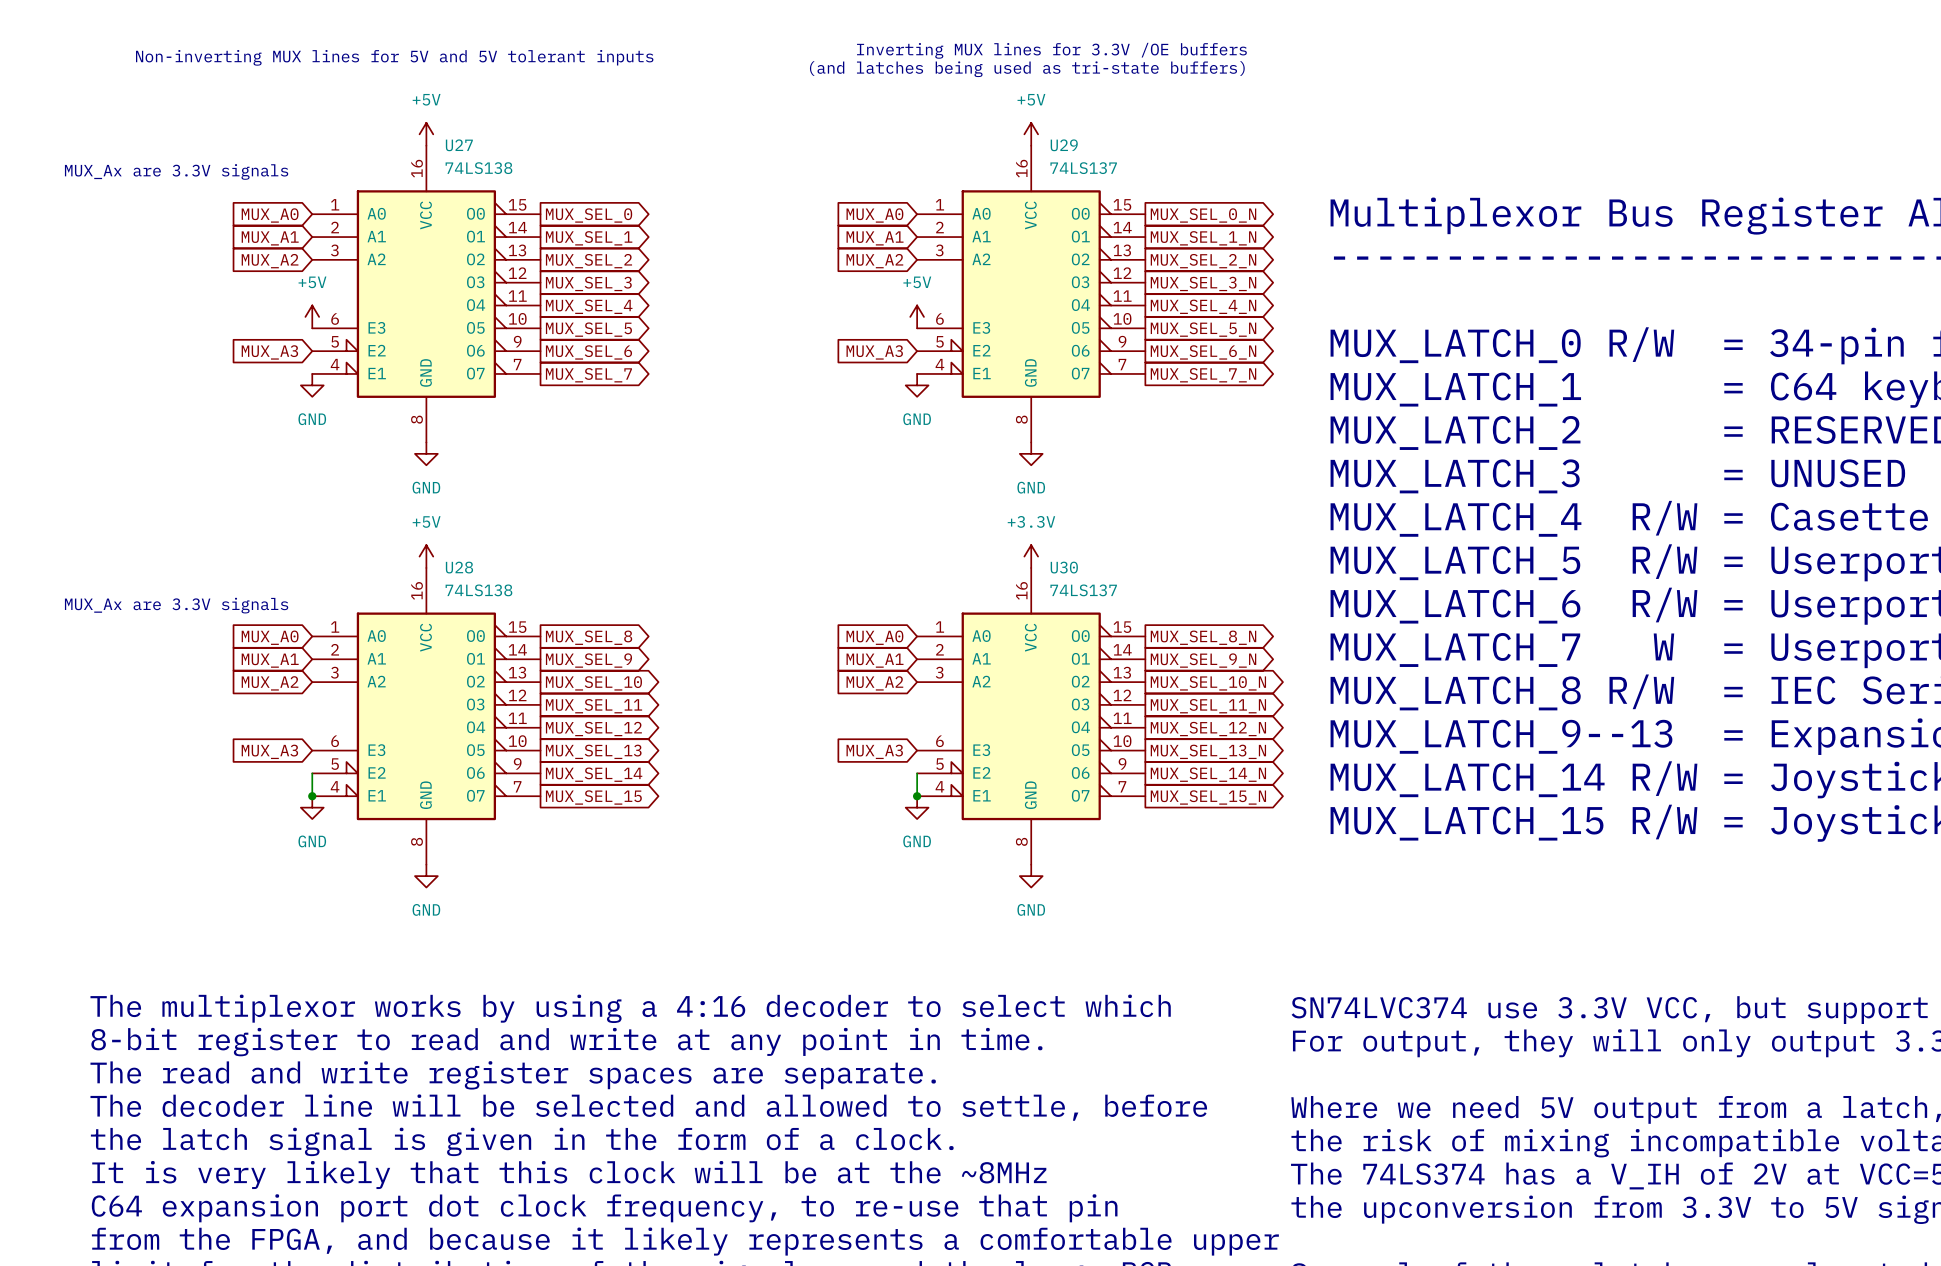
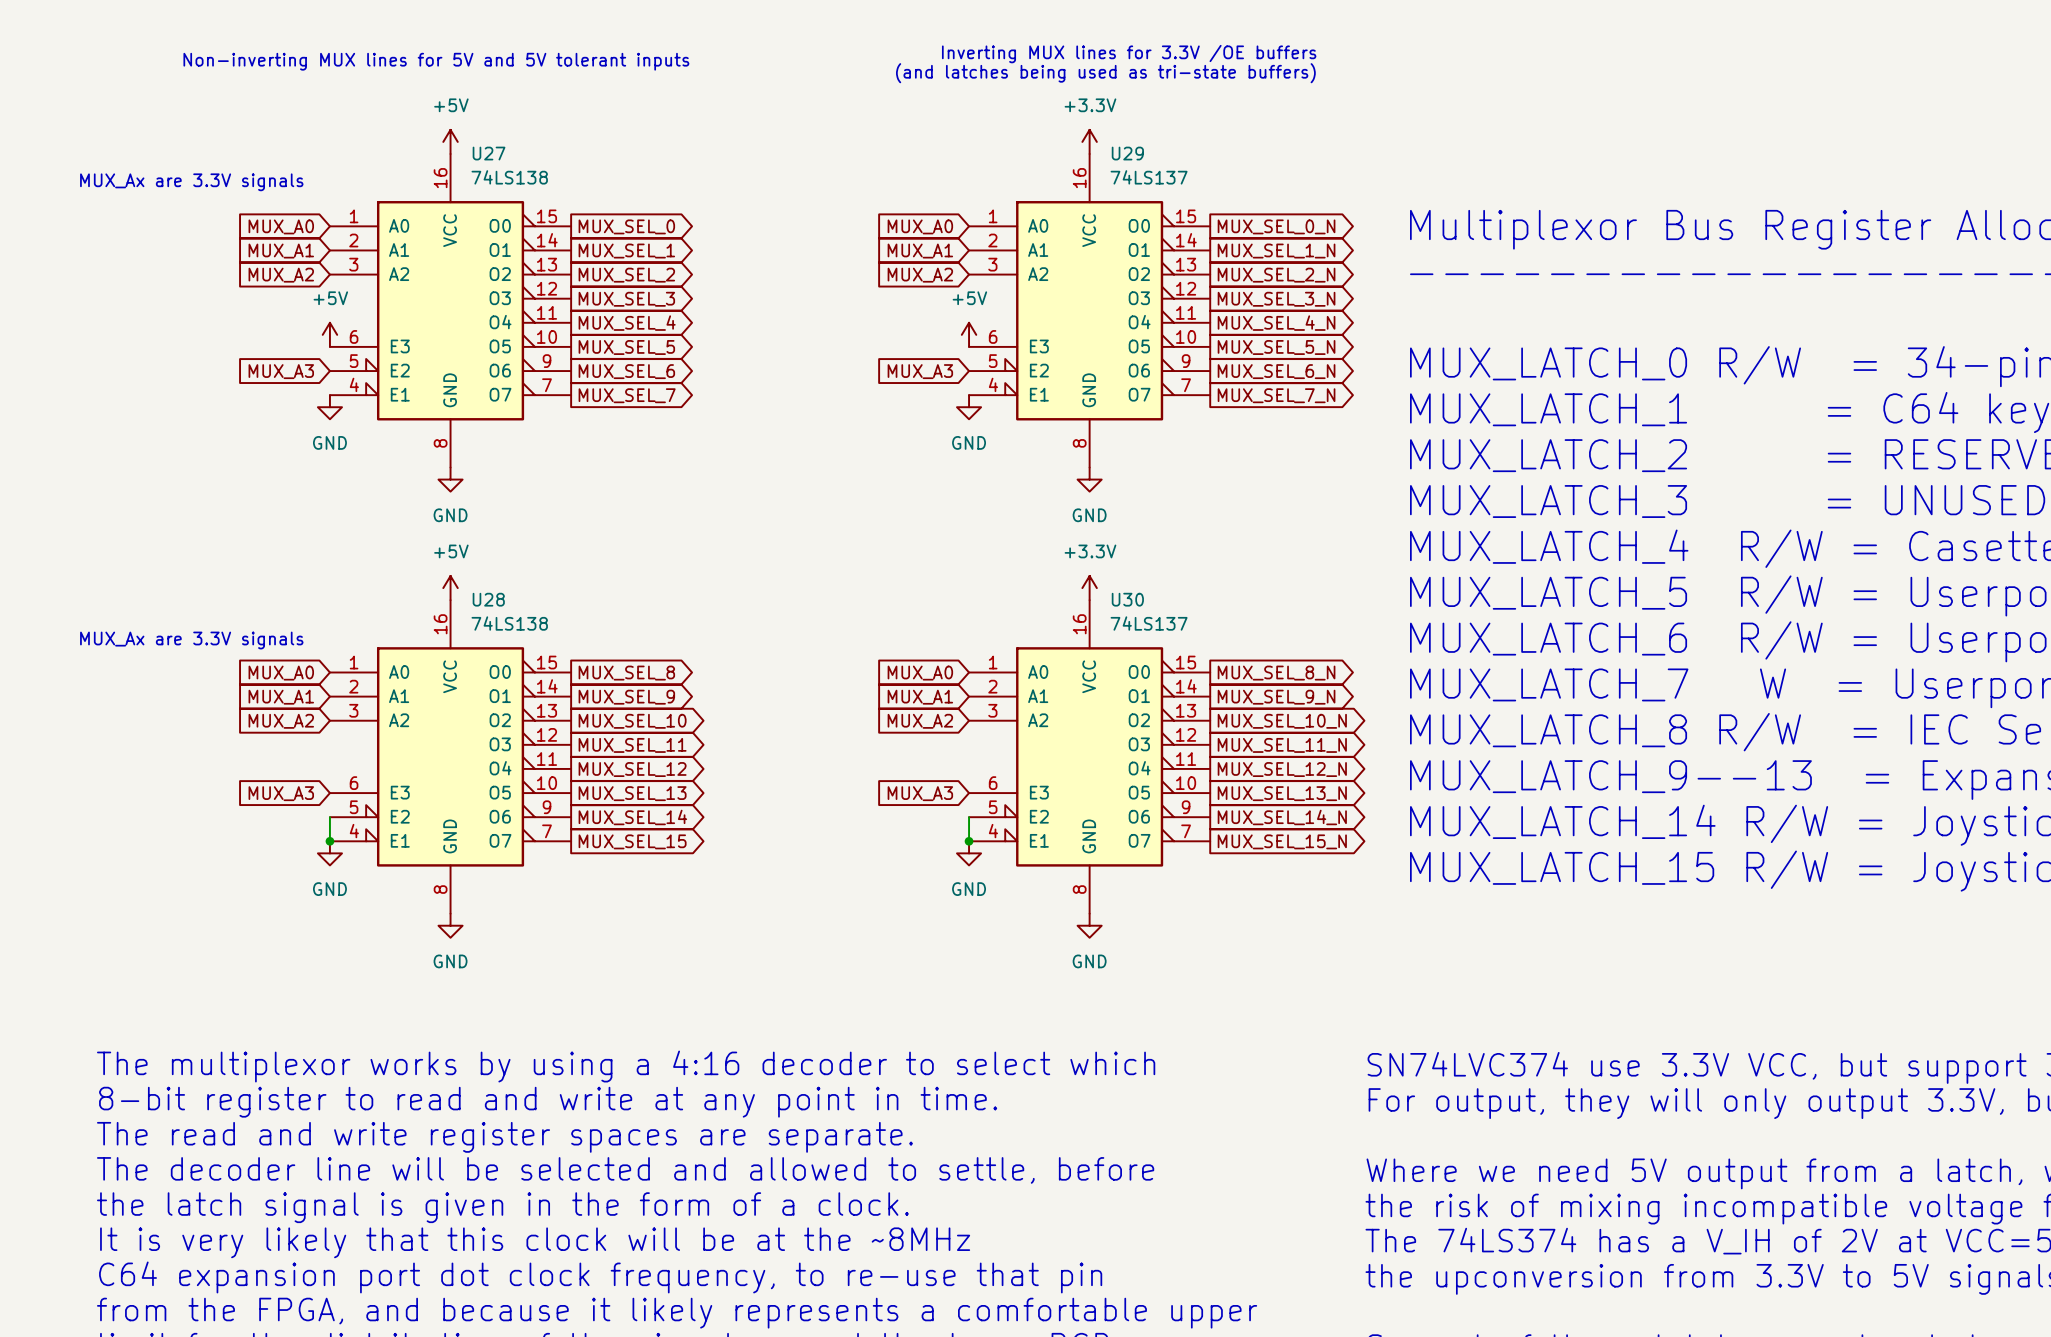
power symbol: +5V (1031, 134) -> +3.3V (1089, 141)

